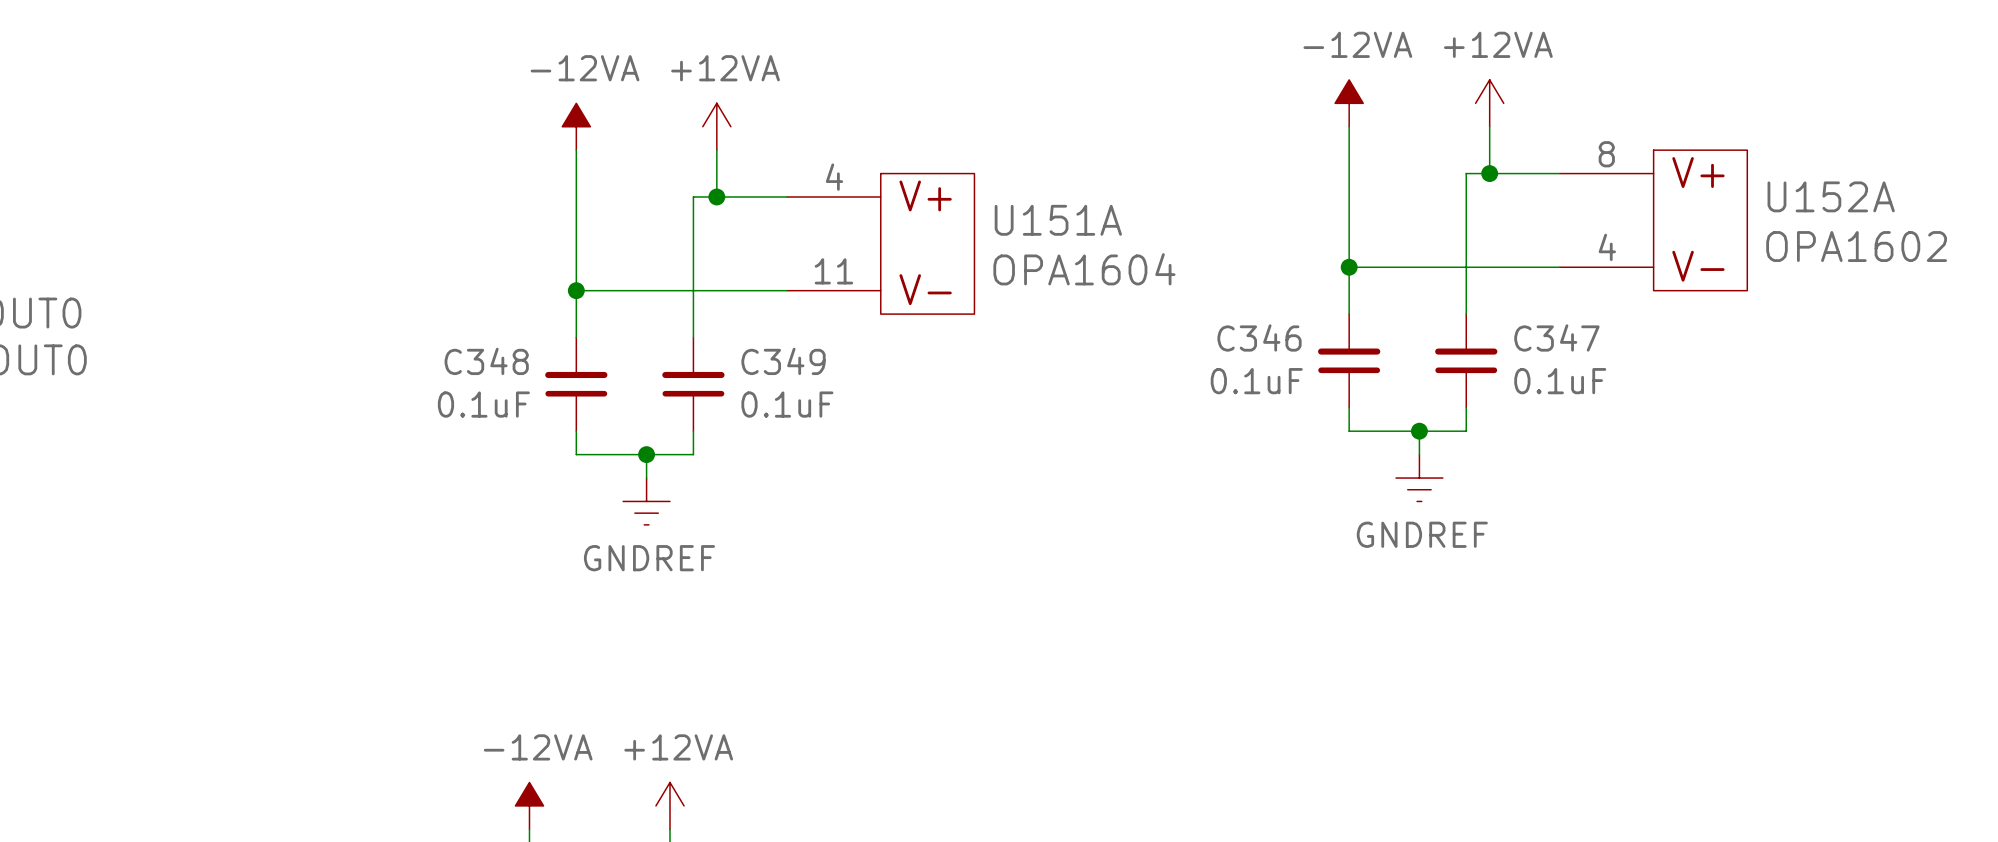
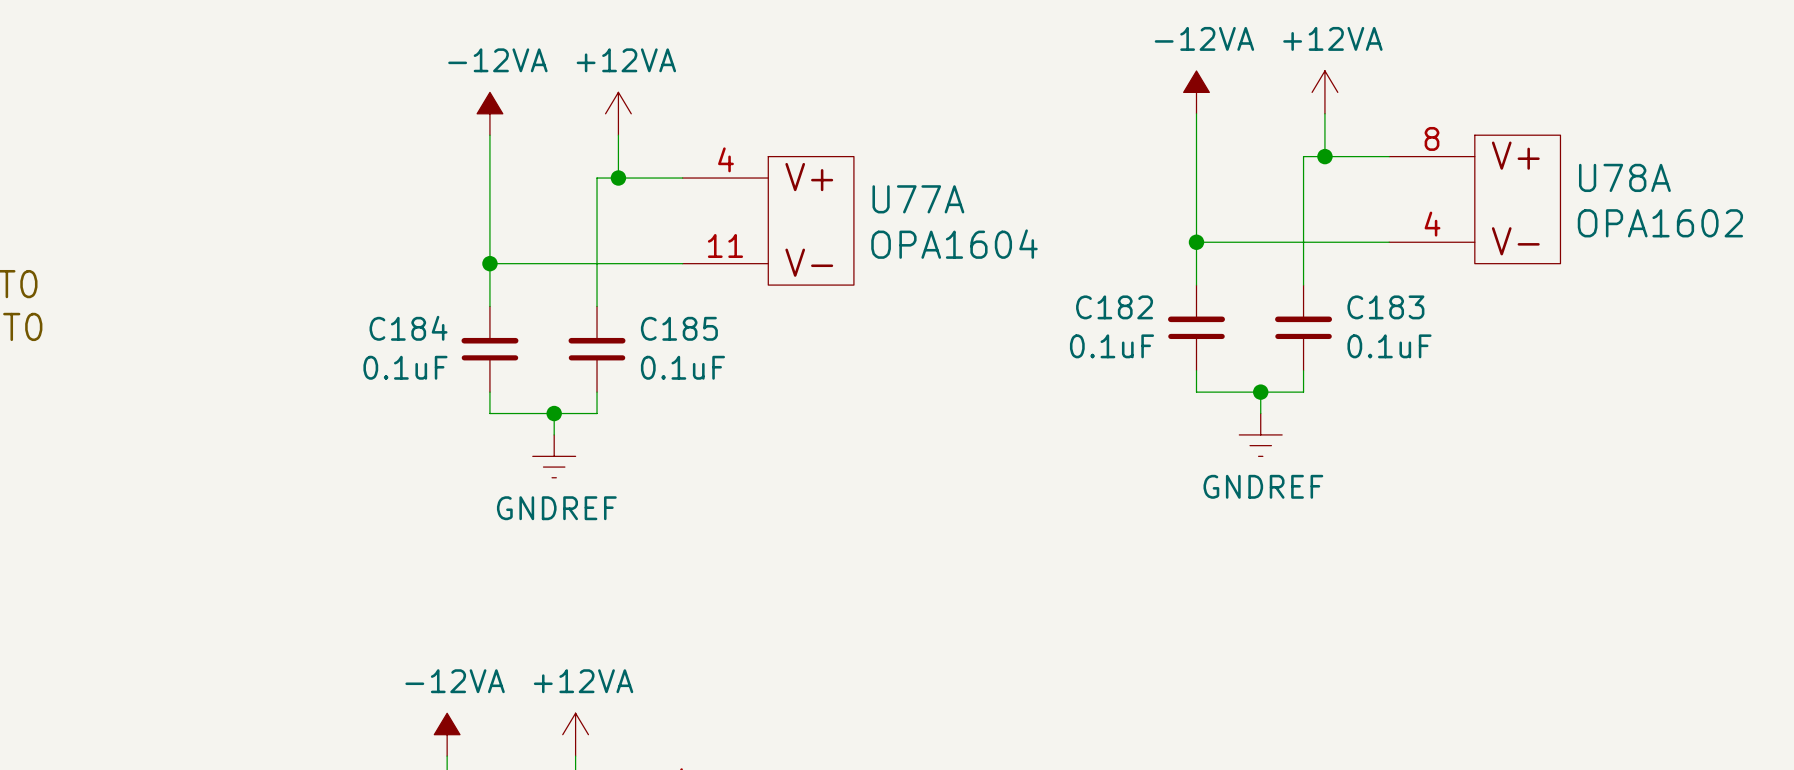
U152A name: U152A (1831, 196) -> U78A (1624, 177)
U151A name: U151A (1058, 220) -> U77A (918, 199)
C346 name: C346 (1259, 337) -> C182 (1114, 307)
C347 name: C347 (1556, 337) -> C183 (1385, 307)
C348 name: C348 (486, 361) -> C184 (408, 328)
C349 name: C349 (783, 361) -> C185 (679, 328)

